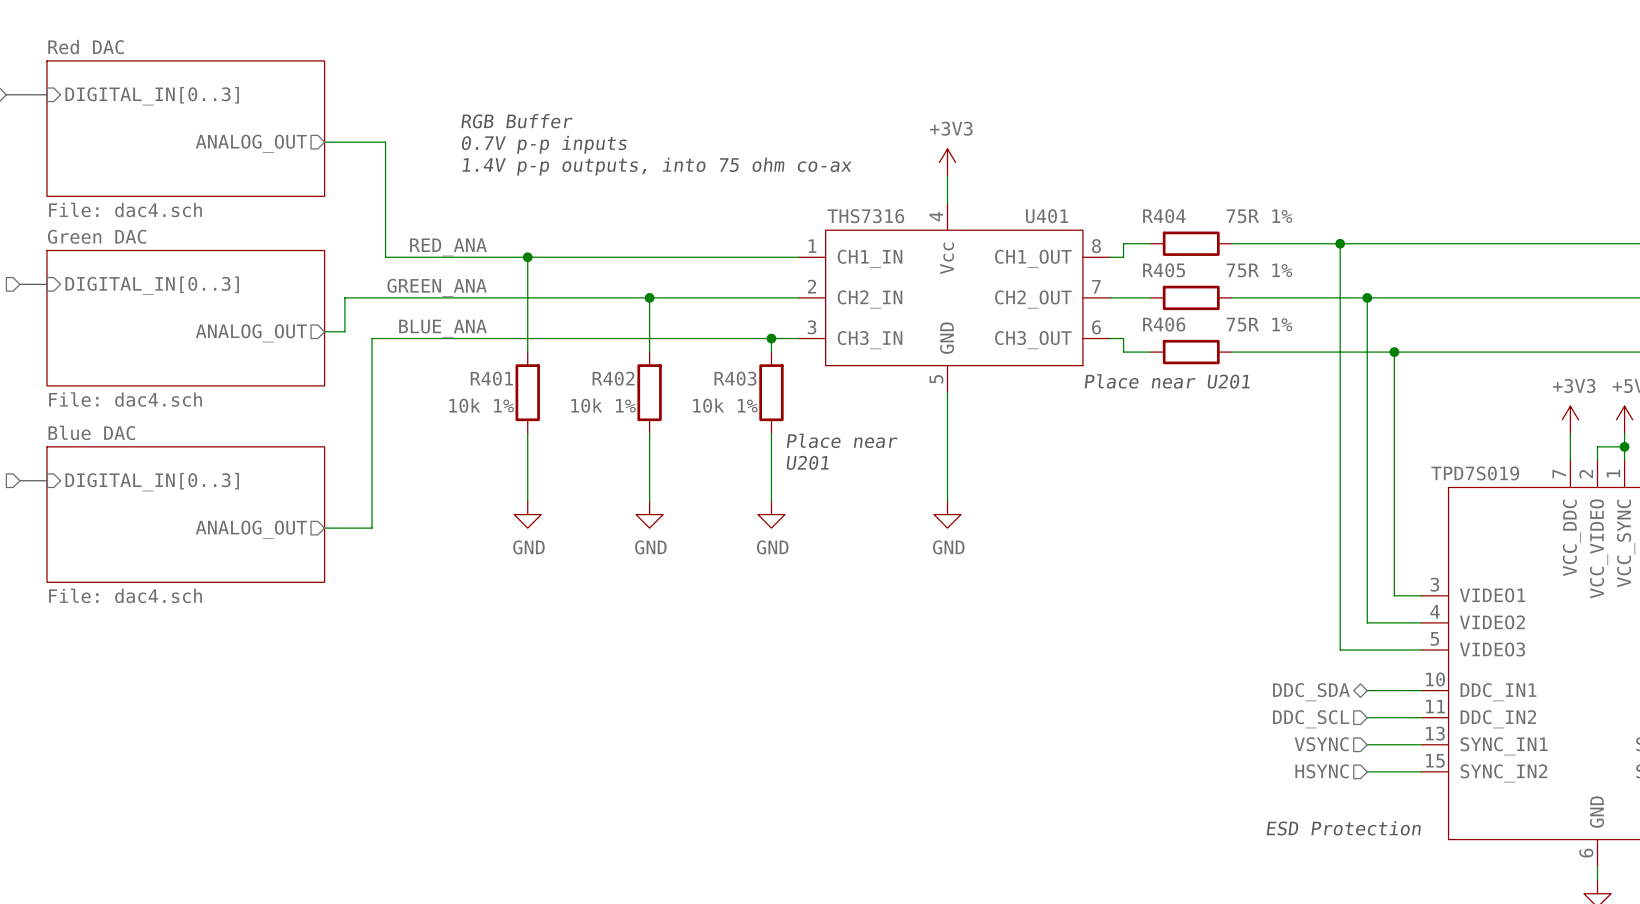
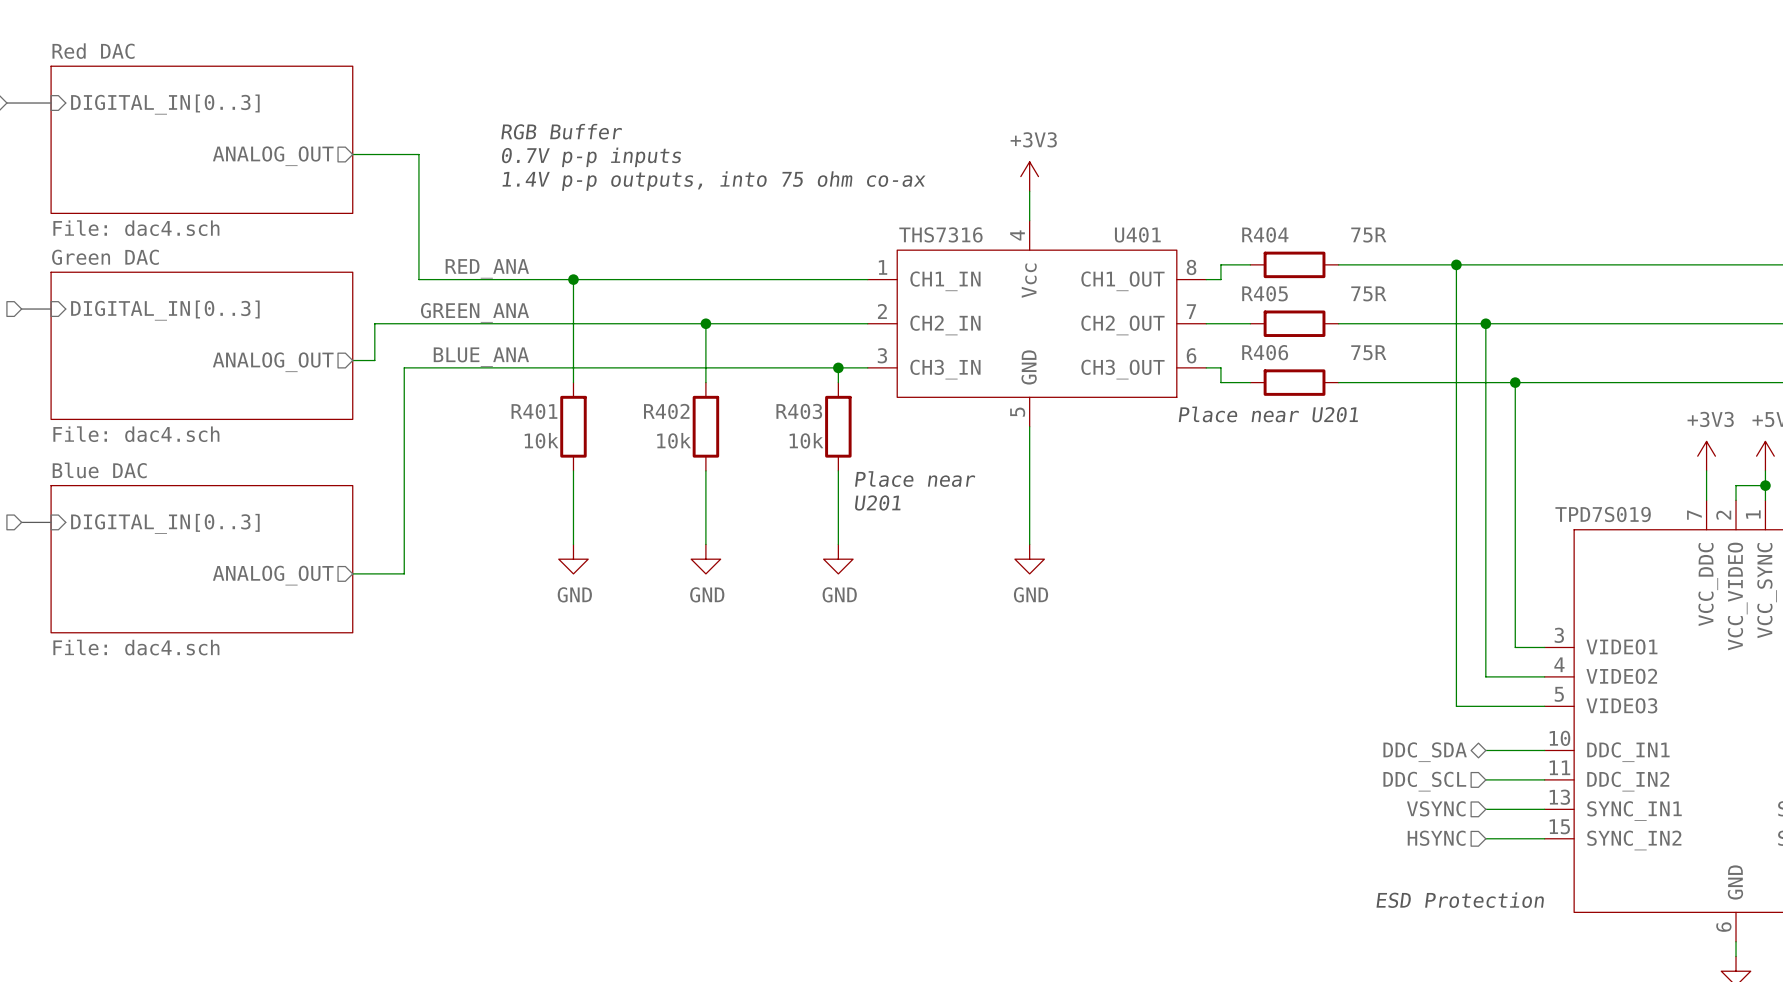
R404 value: 75R 1% (1259, 216) -> 75R (1368, 235)
R405 value: 75R 1% (1259, 270) -> 75R (1368, 293)
R406 value: 75R 1% (1259, 324) -> 75R (1368, 352)
R401 value: 10k 1% (481, 405) -> 10k (541, 440)
R402 value: 10k 1% (603, 405) -> 10k (674, 440)
R403 value: 10k 1% (725, 405) -> 10k (806, 440)

